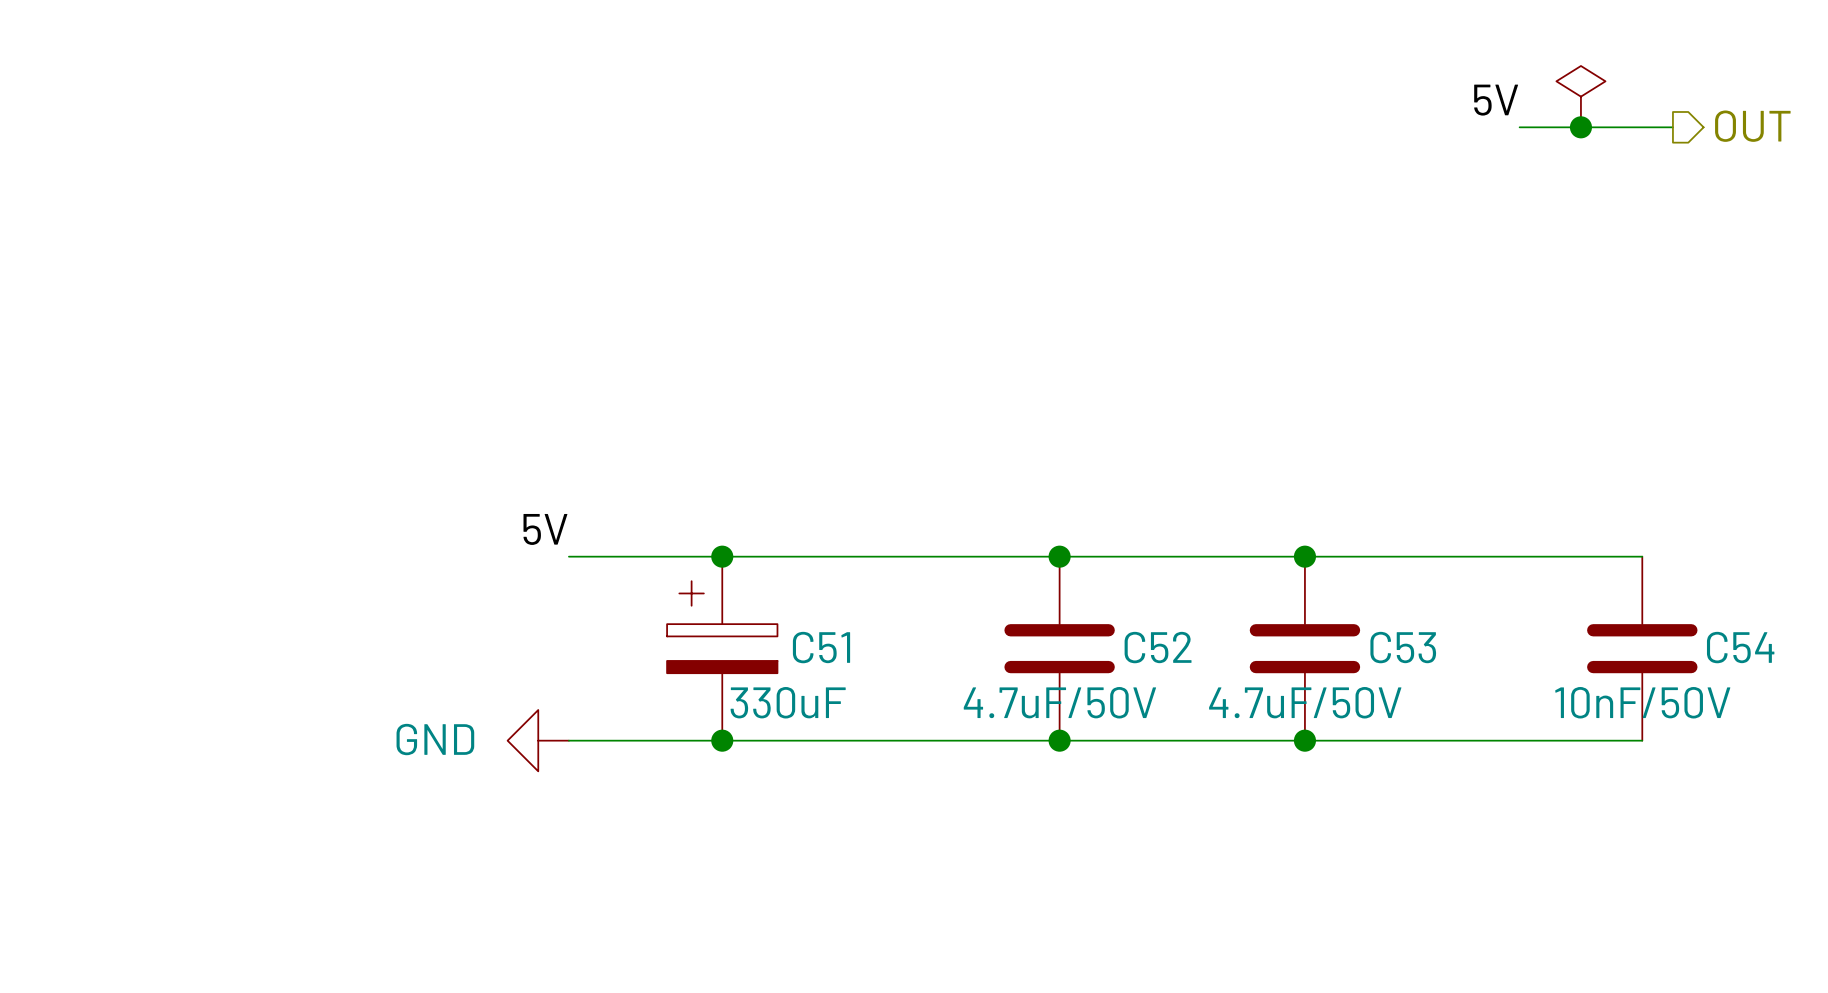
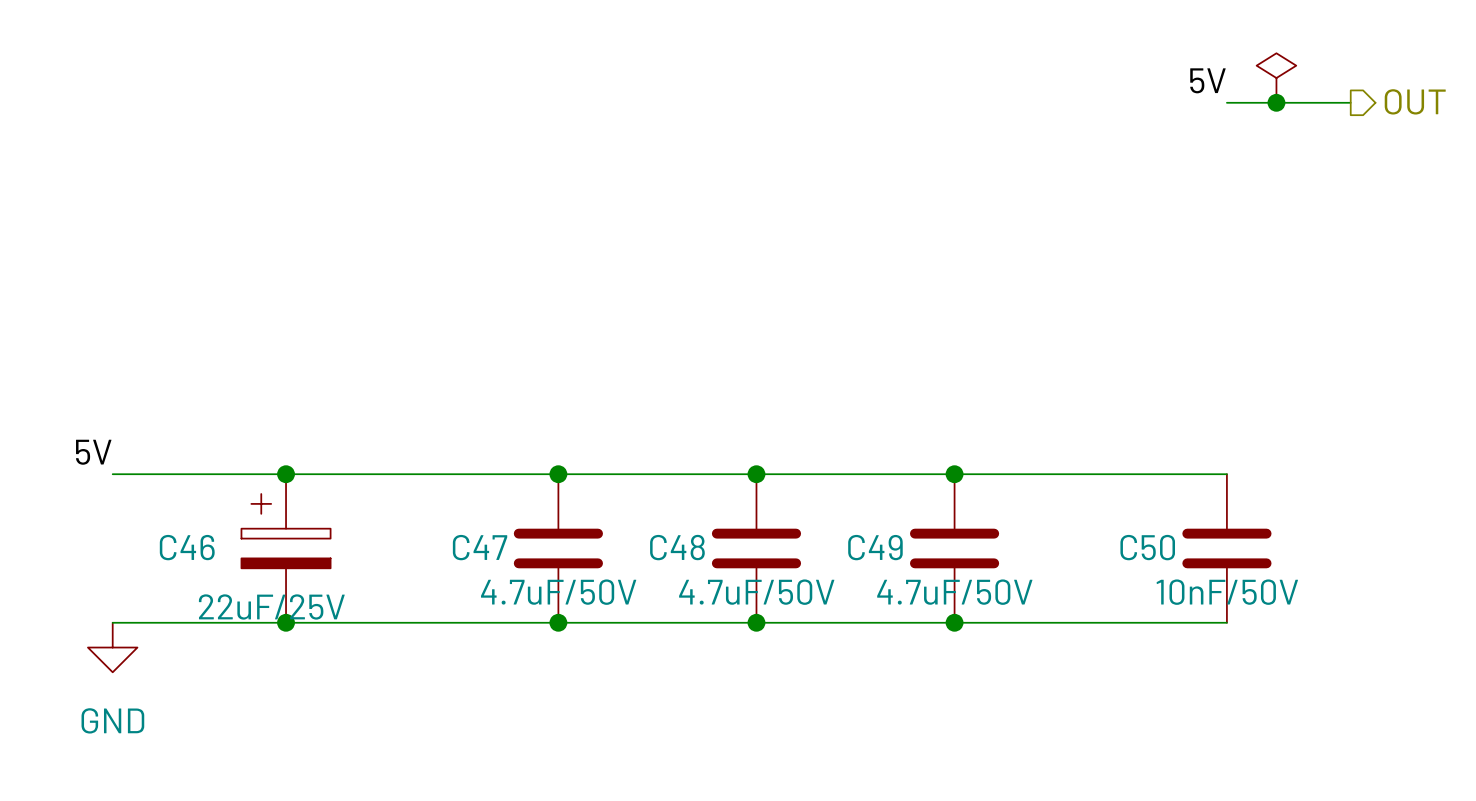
label position: 5V (545, 529) -> 5V (93, 452)
wire: (568, 556) (1642, 556) -> none
junction position: (722, 556) -> (558, 474)
junction: (1059, 556) -> none
junction: (1304, 556) -> none
wire: none -> (112, 474) (1226, 474)
junction: none -> (286, 474)
junction: none -> (756, 474)
junction: none -> (954, 474)
C51: 330uF (722, 648) -> none
C52: 4.7uF/50V (1059, 648) -> none
C53: 4.7uF/50V (1304, 648) -> none
C54: 10nF/50V (1642, 648) -> none
C46: none -> 22uF/25V (286, 548)
C47: none -> 4.7uF/50V (558, 548)
C48: none -> 4.7uF/50V (756, 548)
C49: none -> 4.7uF/50V (954, 548)
C50: none -> 10nF/50V (1226, 548)
power symbol rotation: 0° (538, 740) -> 90° counterclockwise (112, 647)
power symbol position: GND (538, 740) -> GND (112, 647)
wire: (568, 740) (1642, 740) -> none
junction position: (722, 740) -> (558, 622)
junction: (1059, 740) -> none
junction: (1304, 740) -> none
wire: none -> (112, 622) (1226, 622)
junction: none -> (286, 622)
junction: none -> (756, 622)
junction: none -> (954, 622)

